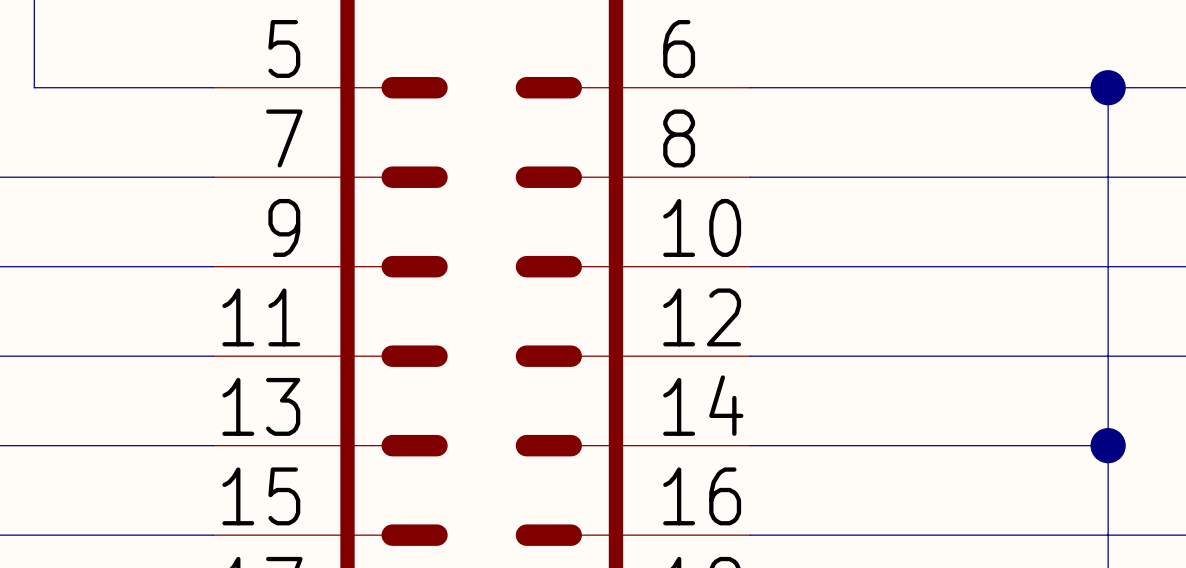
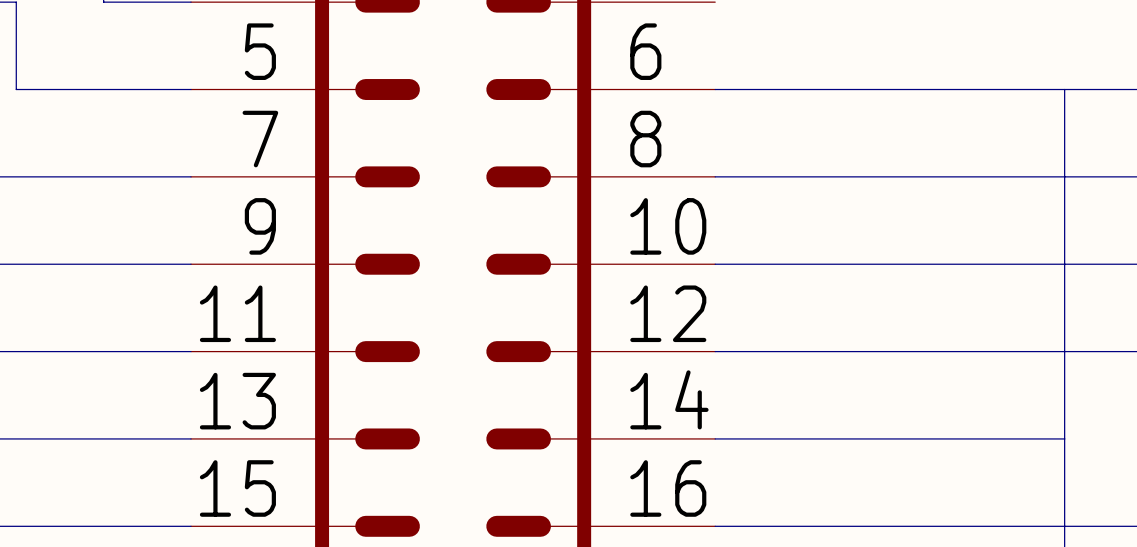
junction: (1108, 87) -> none
junction: (1108, 445) -> none

